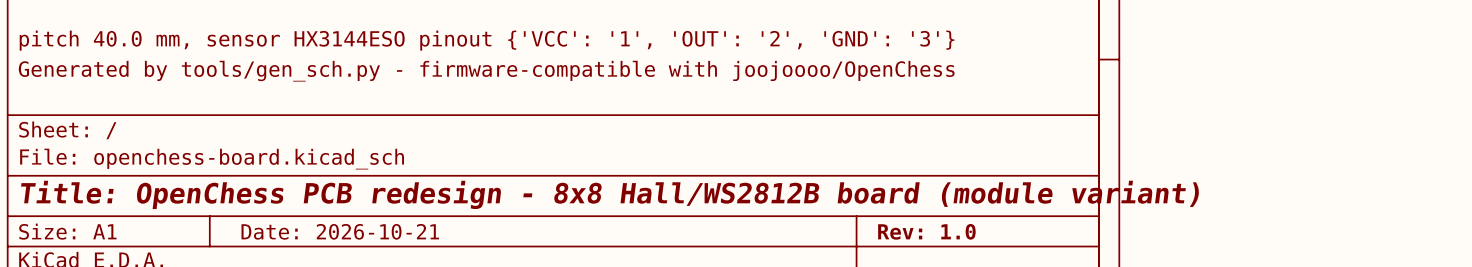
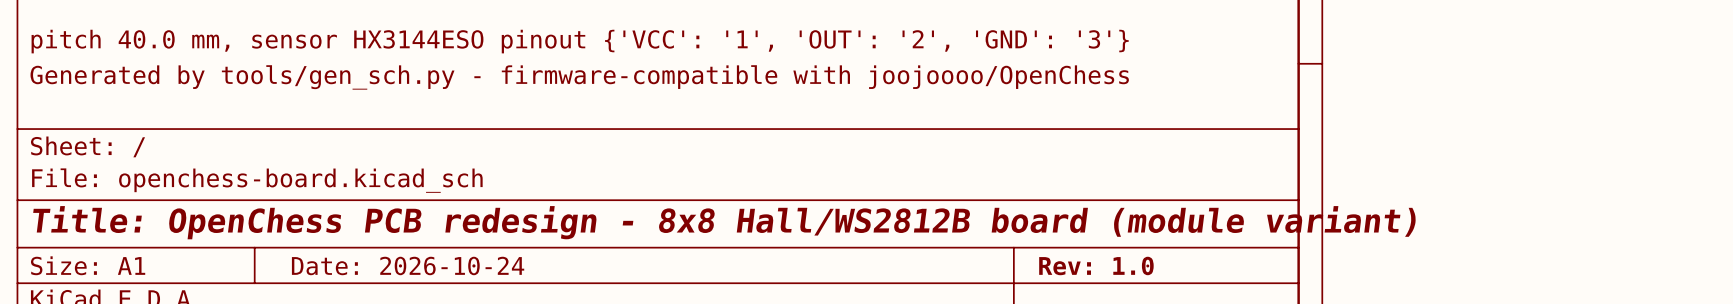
title block: Date: 2026-10-21 (340, 231) -> Date: 2026-10-24 (408, 265)

